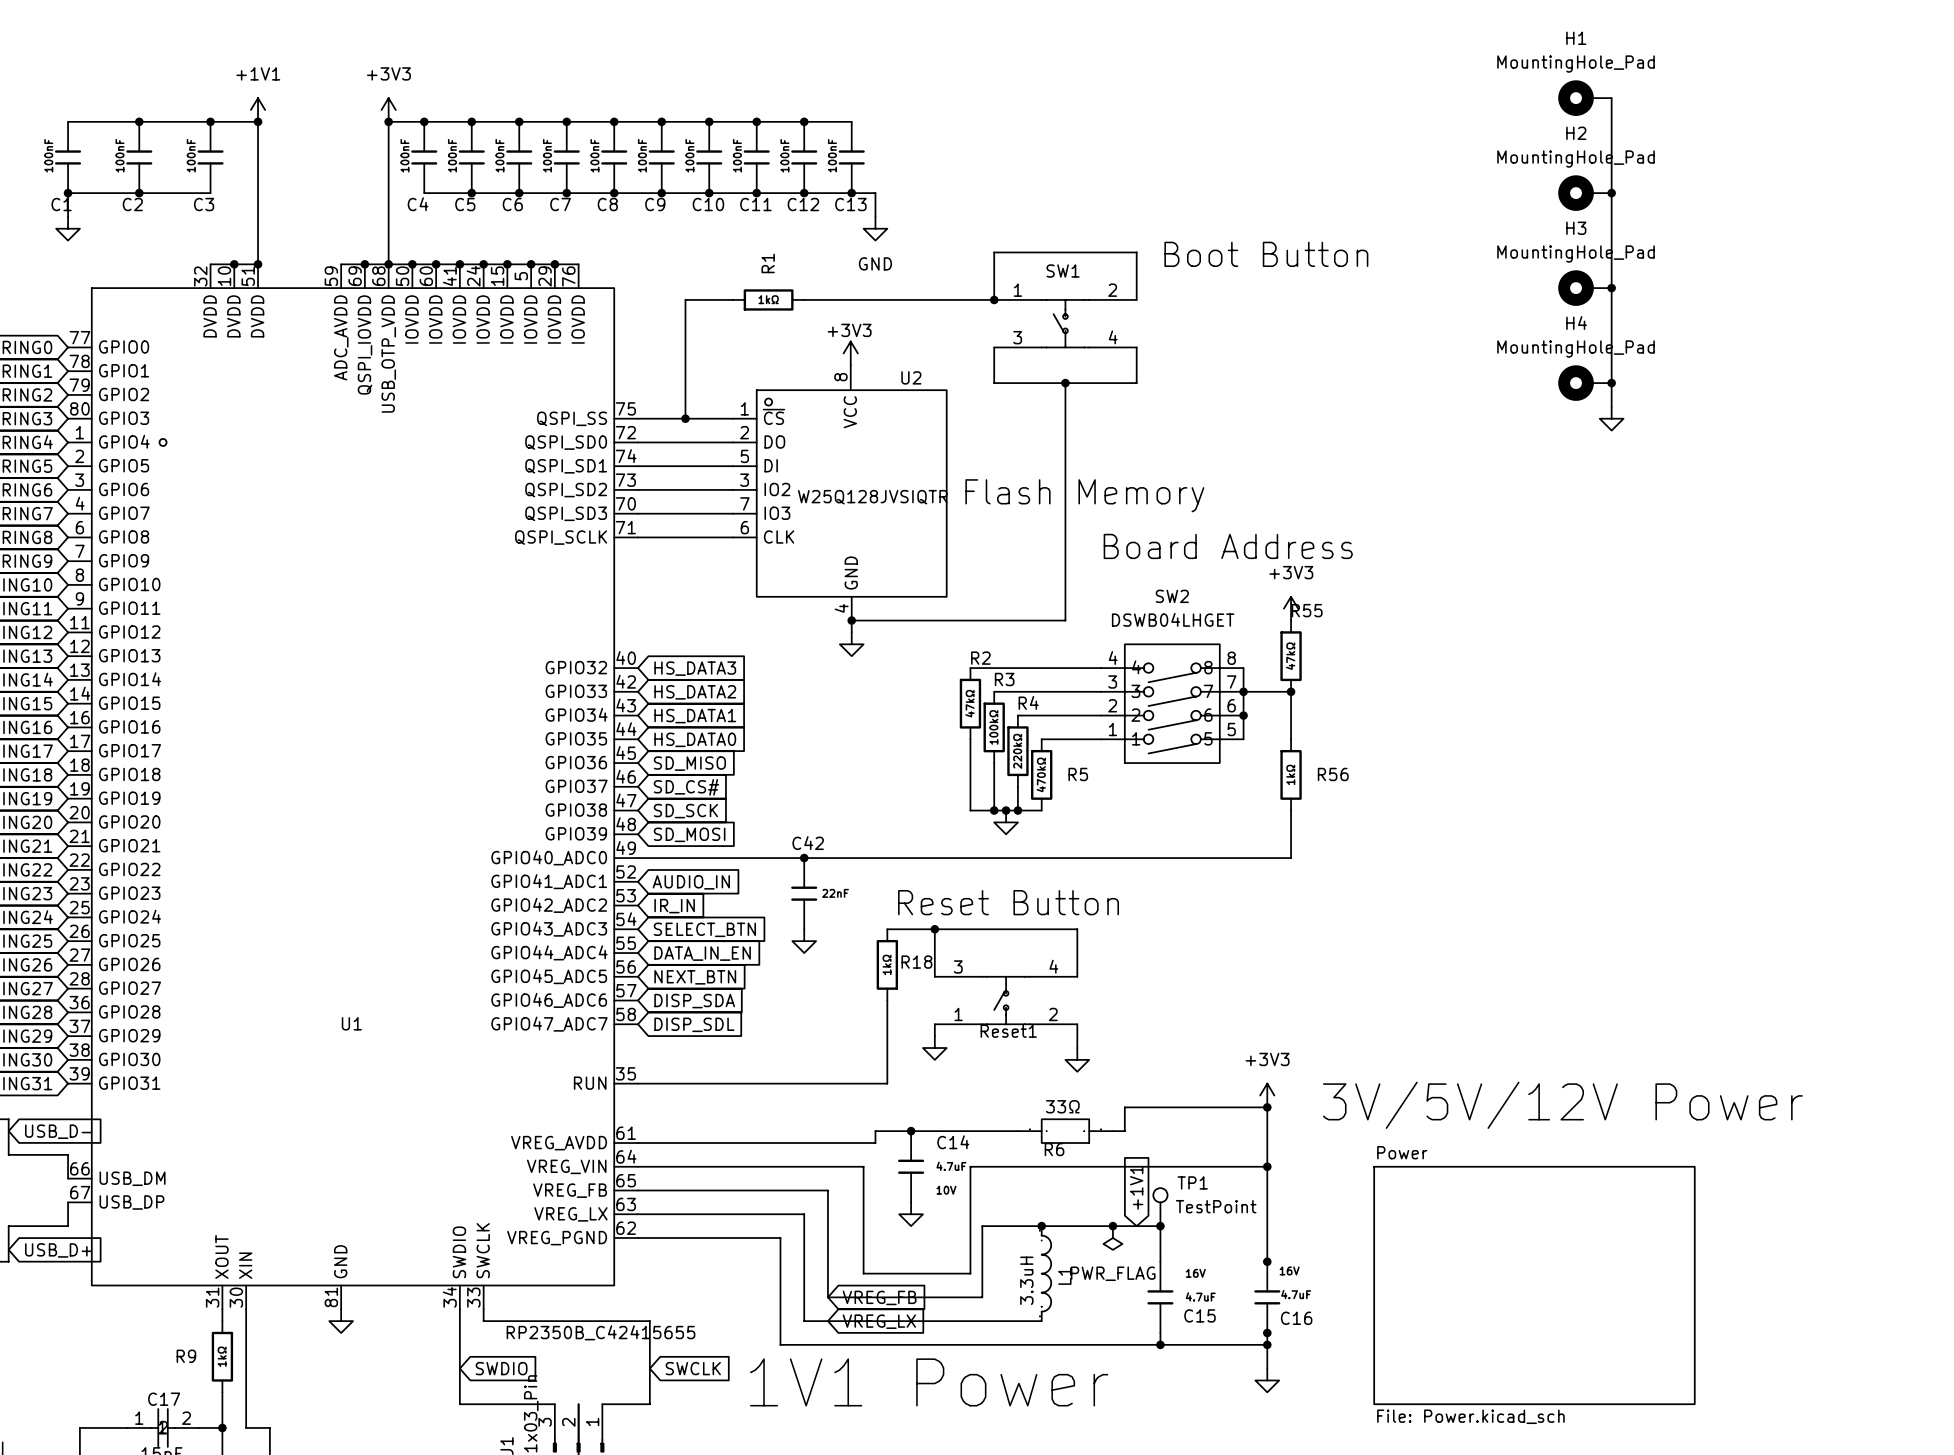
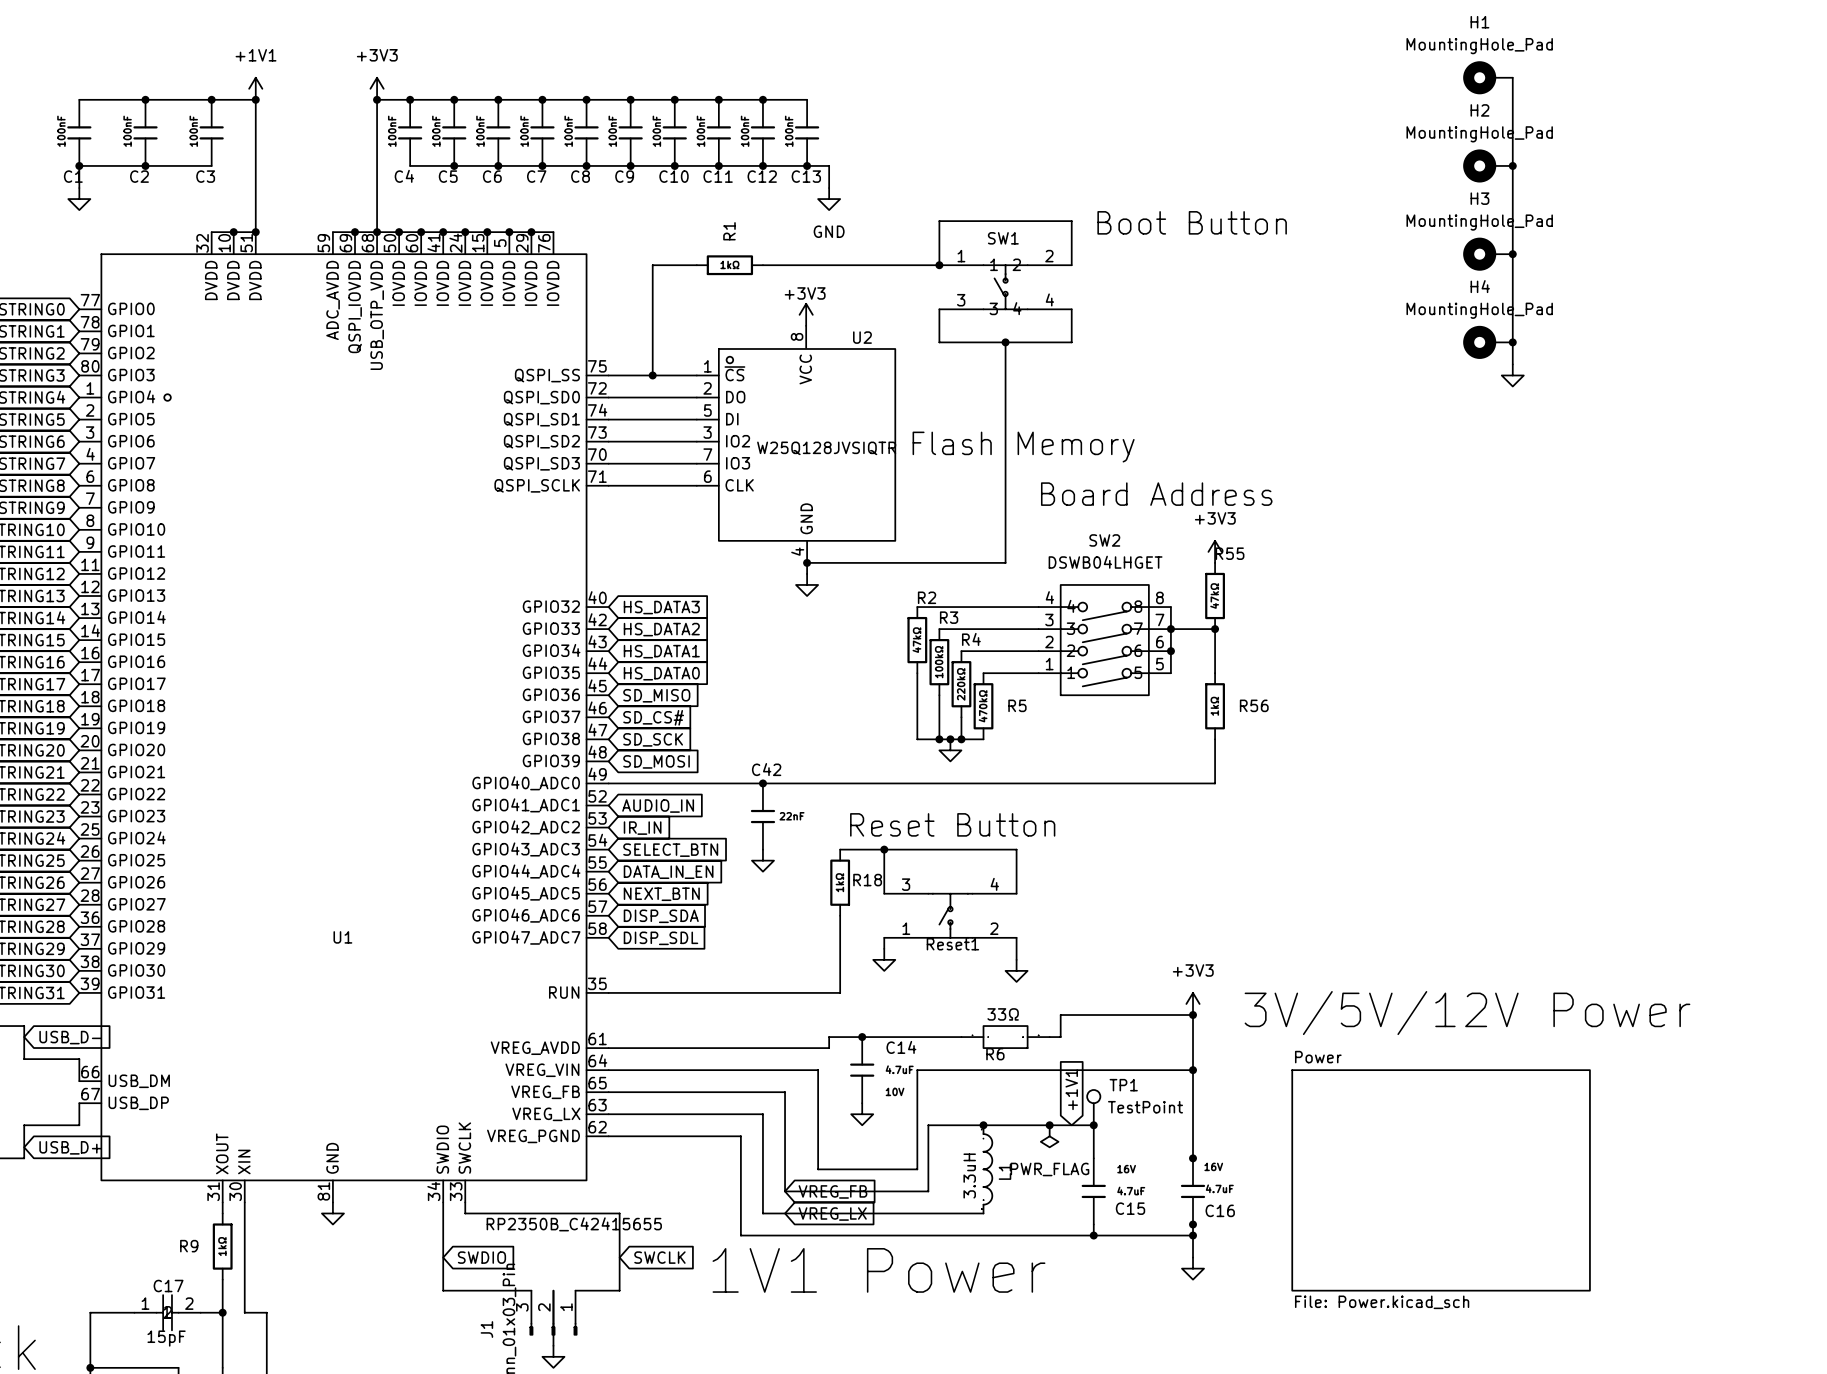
SW1 symbol: [994, 299, 1137, 348] -> [939, 265, 1072, 310]

